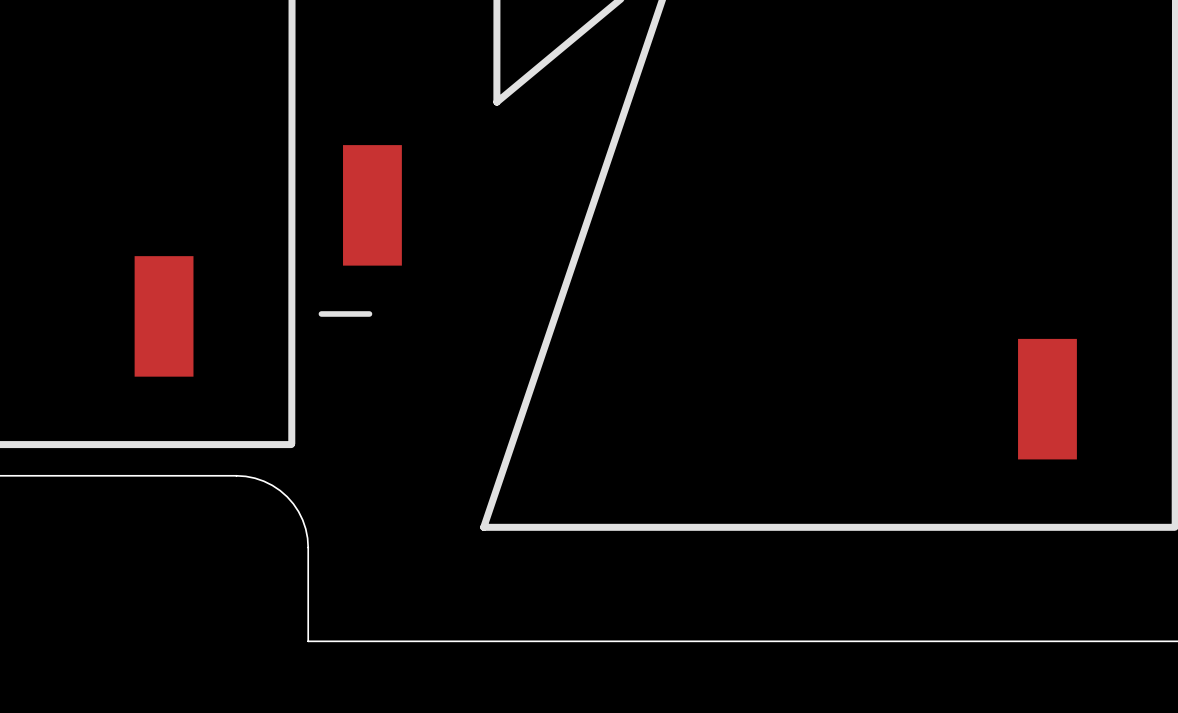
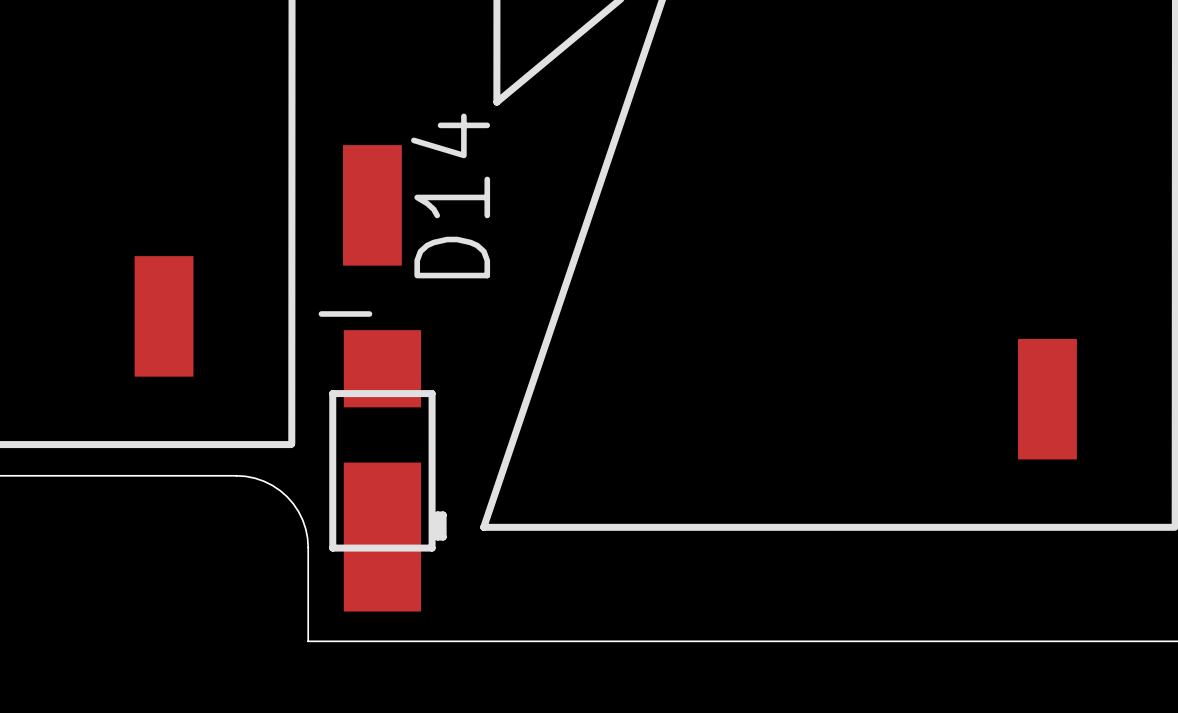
D14: none -> (387, 470)

